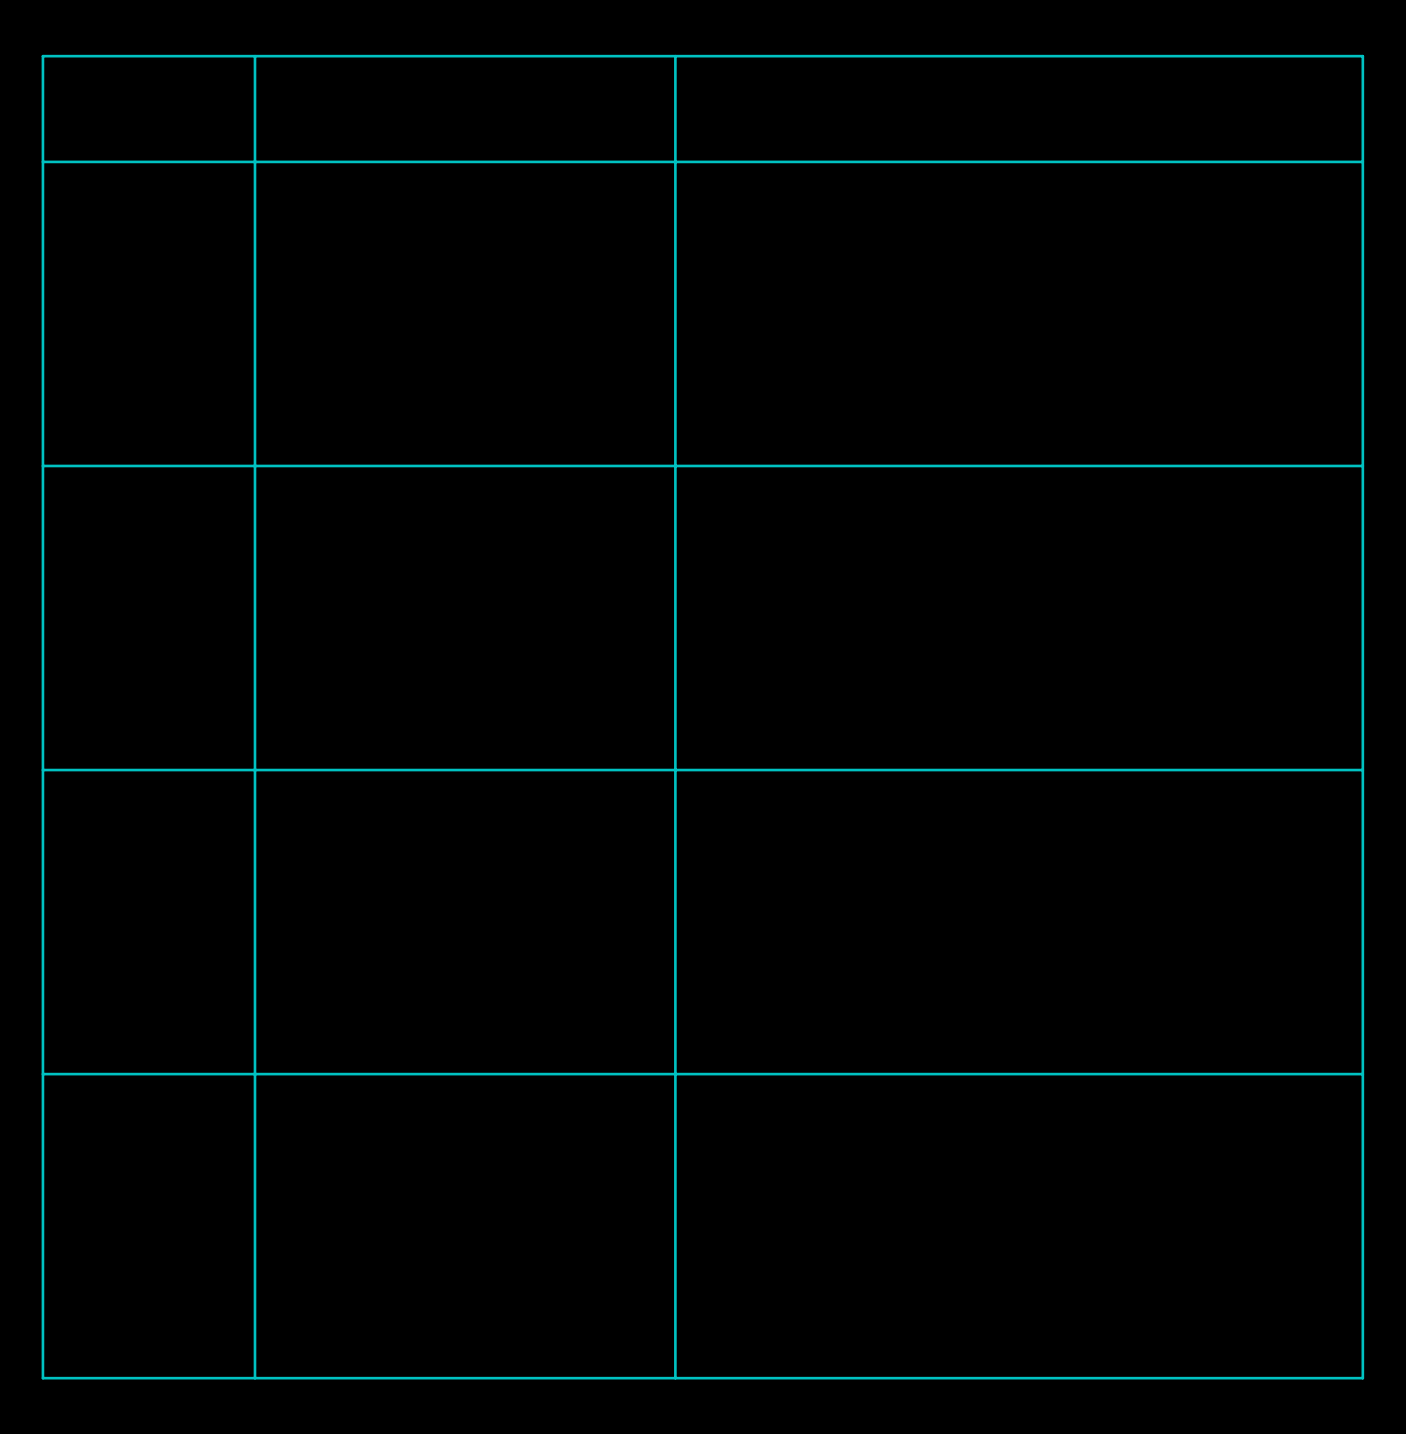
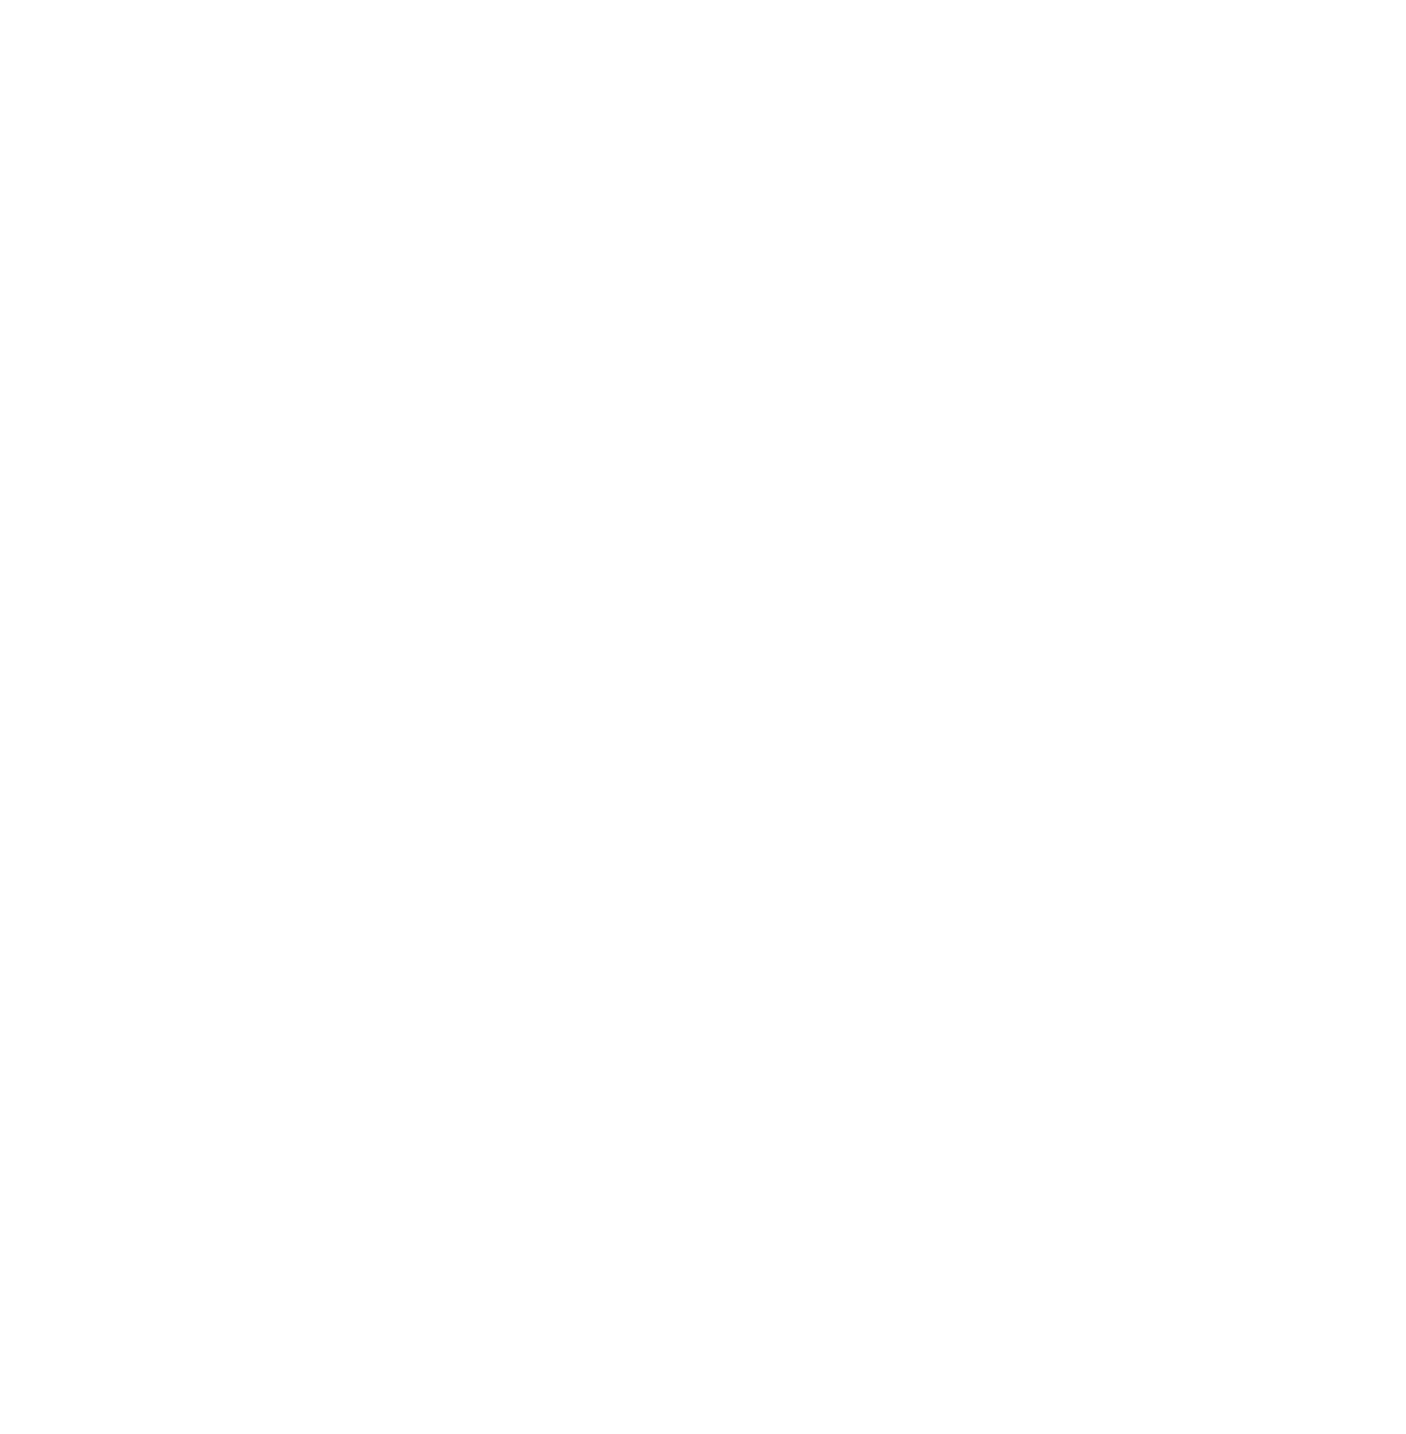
line: (254, 56) (254, 1378) -> none
line: (675, 56) (675, 1378) -> none
line: (1362, 56) (42, 56) (42, 1378) (1362, 1378) (1362, 56) -> none
line: (1362, 161) (42, 161) -> none
line: (1362, 465) (42, 465) -> none
line: (1362, 770) (42, 770) -> none
line: (1362, 1074) (42, 1074) -> none

